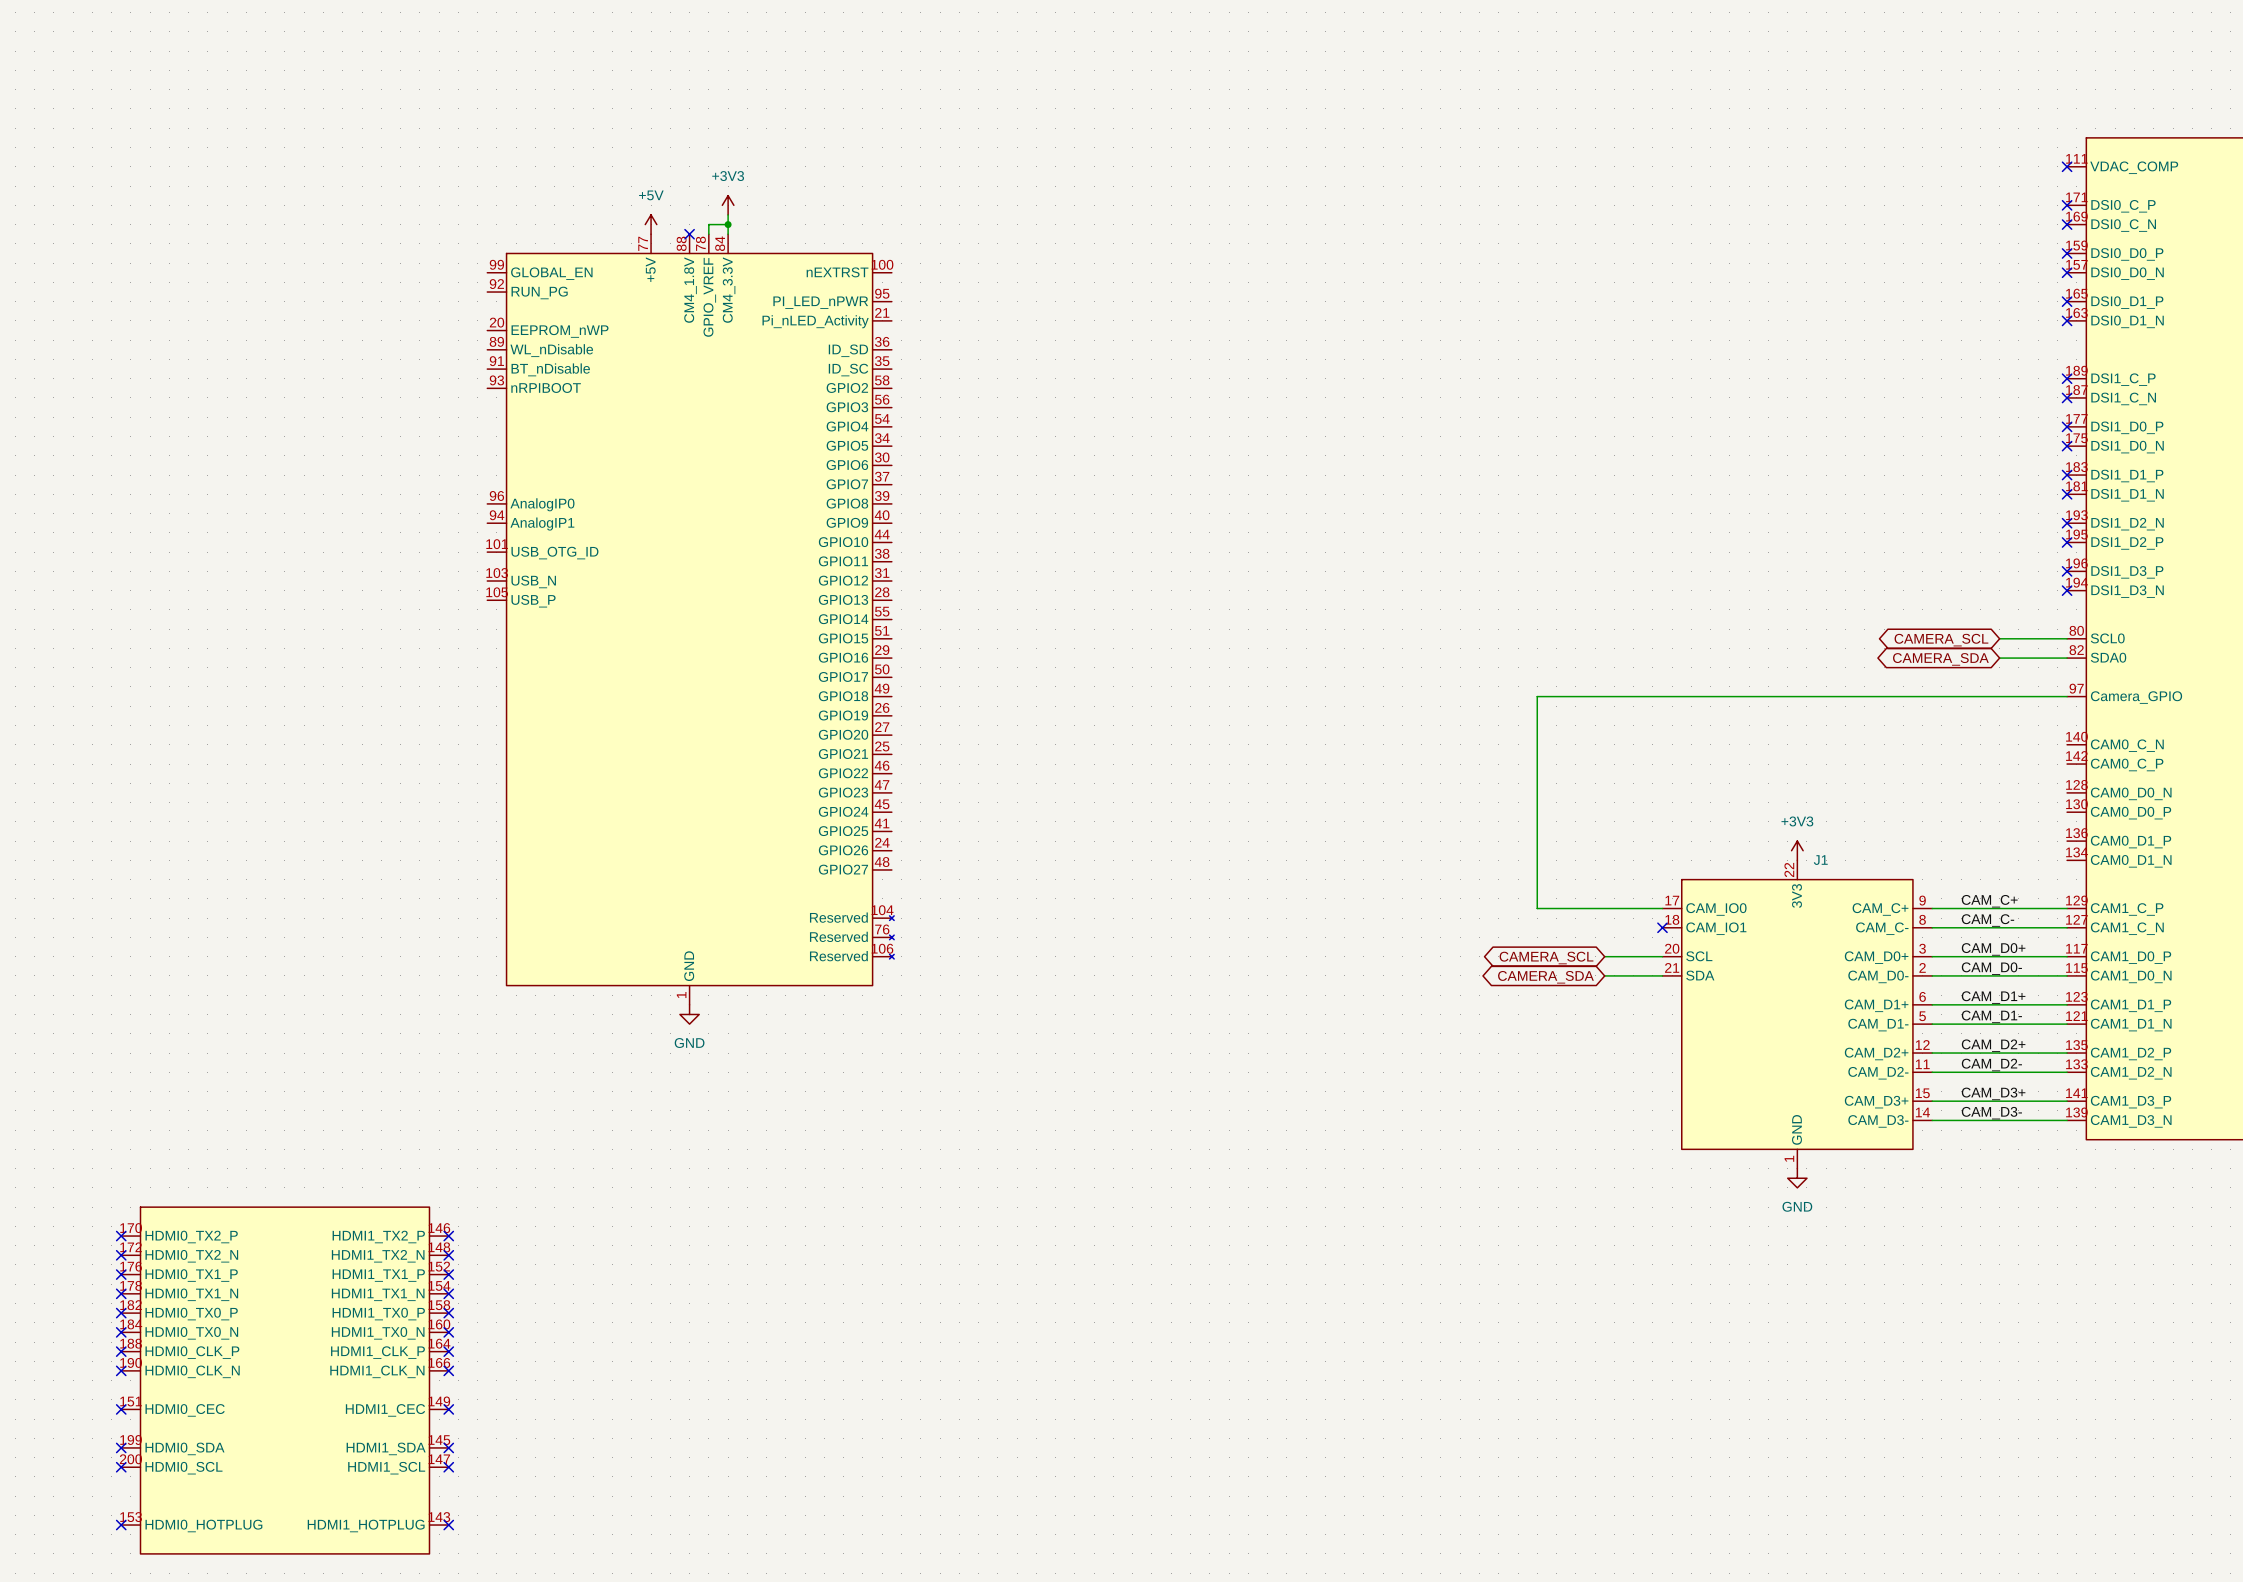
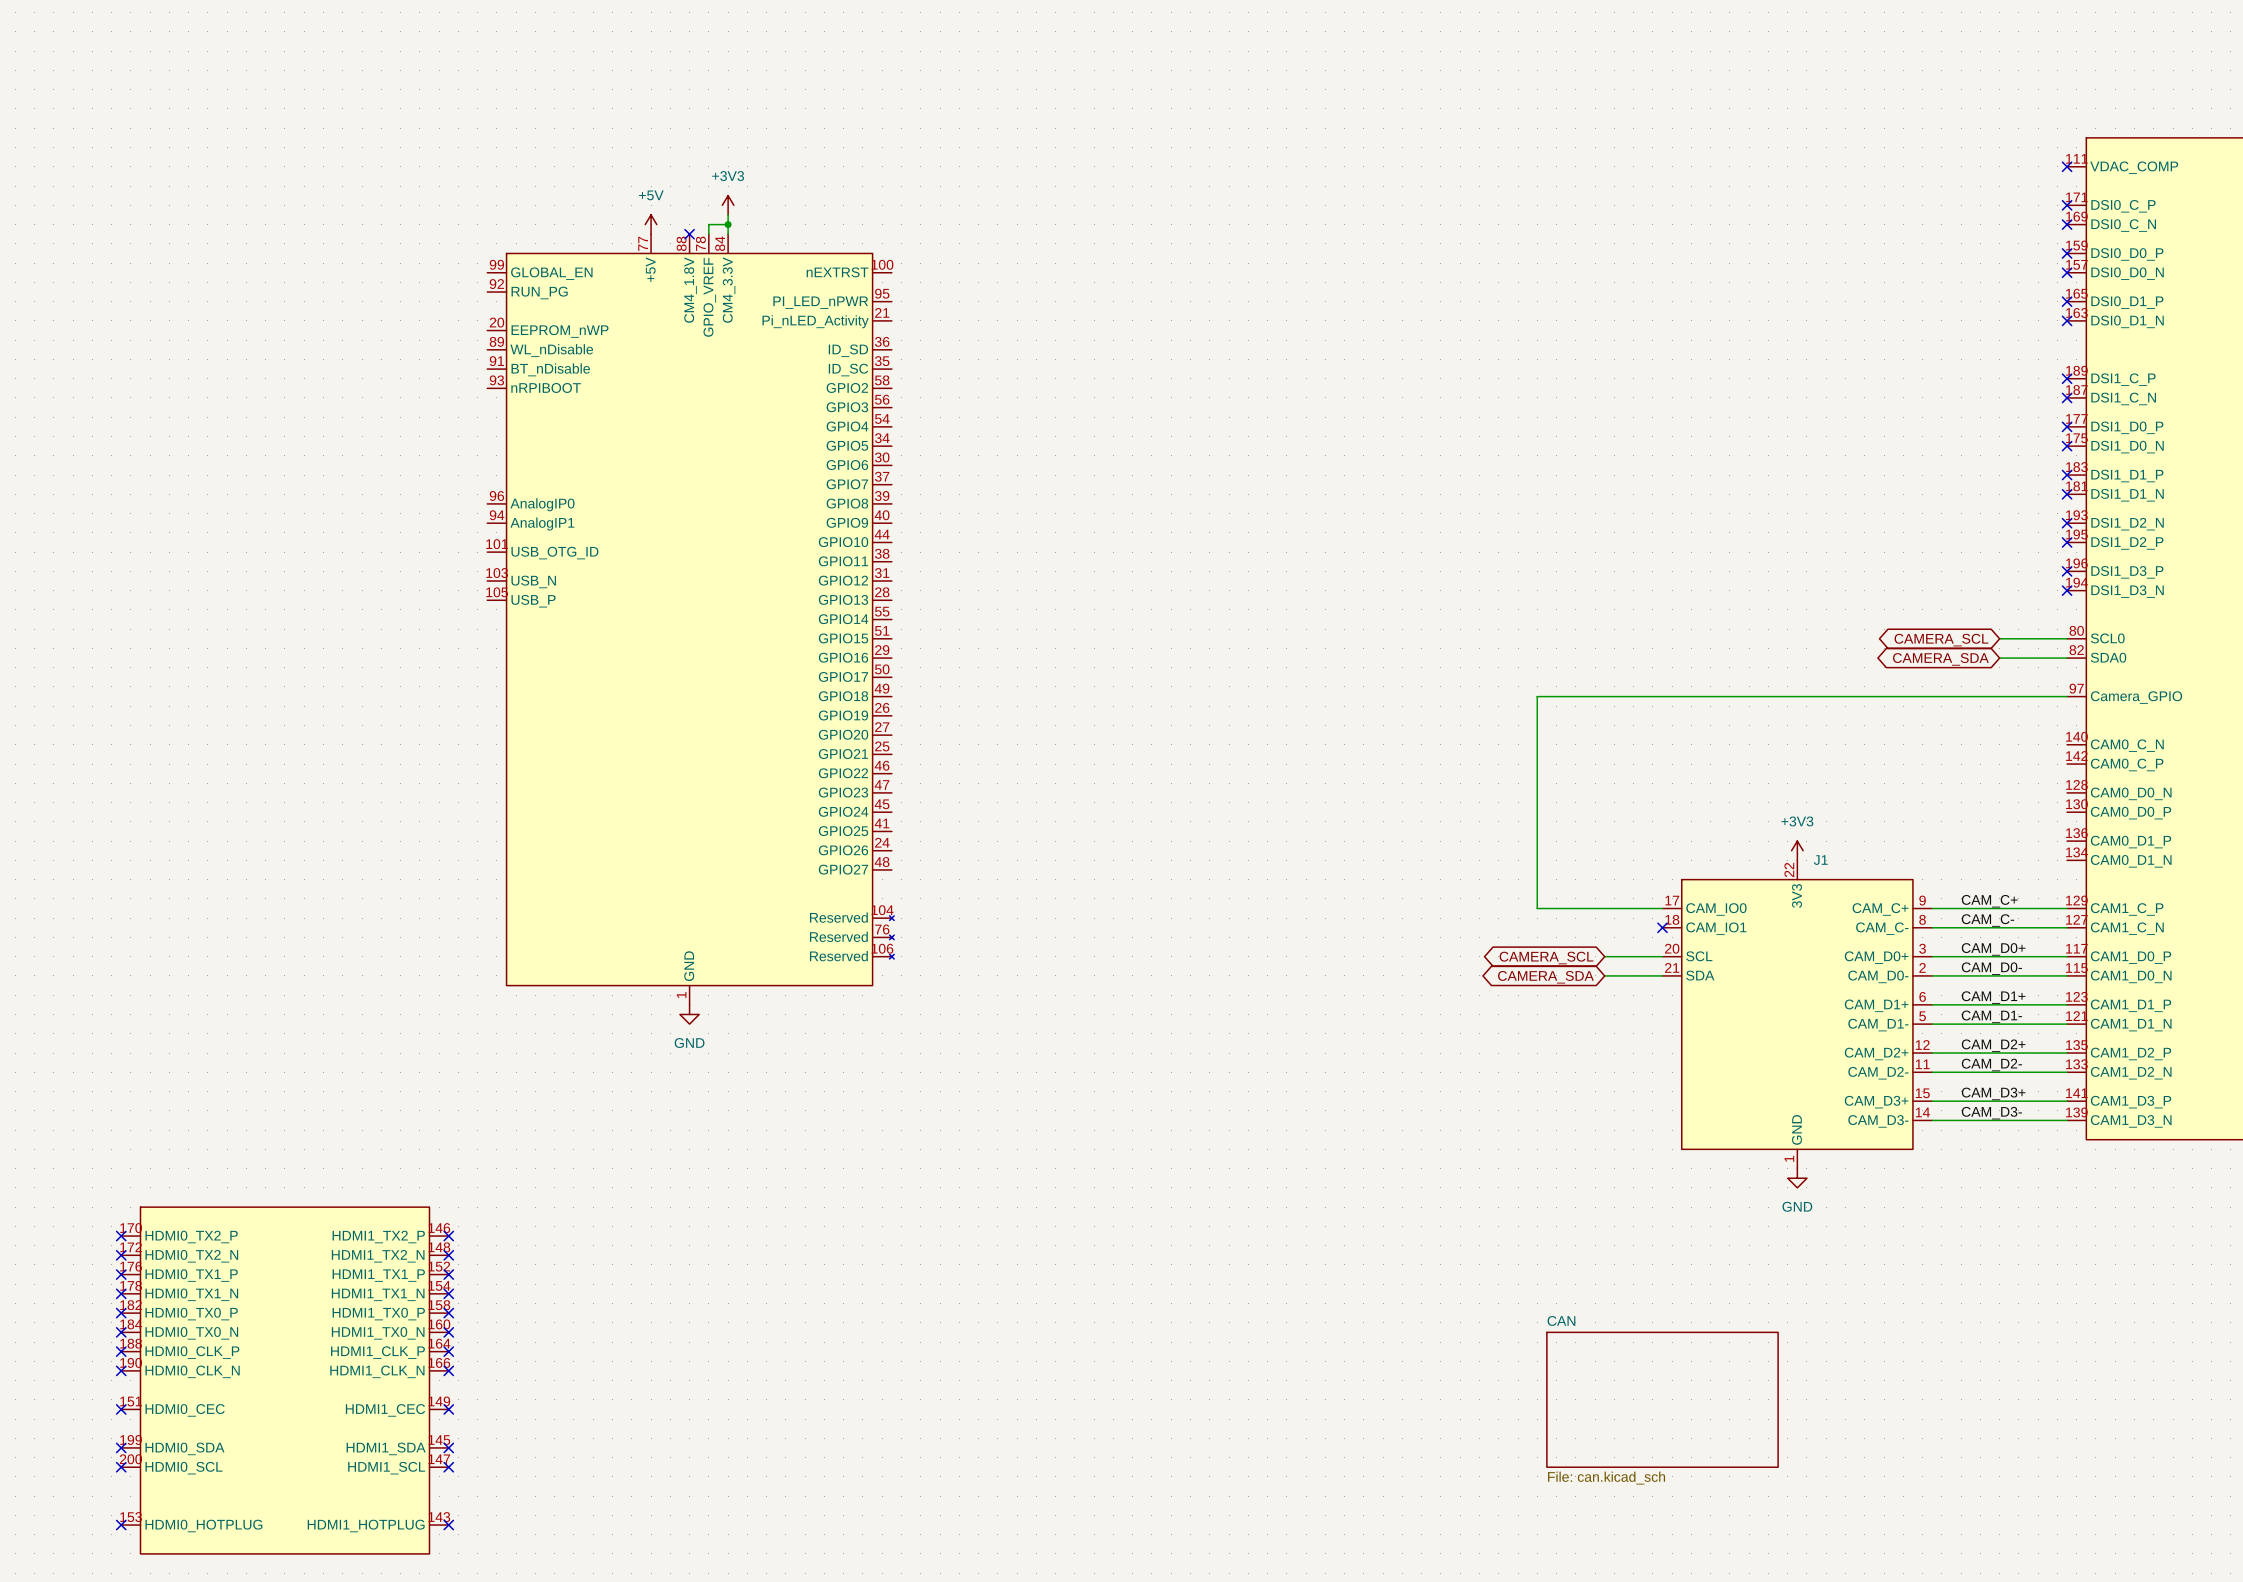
sheet CAN: none -> File: can.kicad_sch (1662, 1399)

